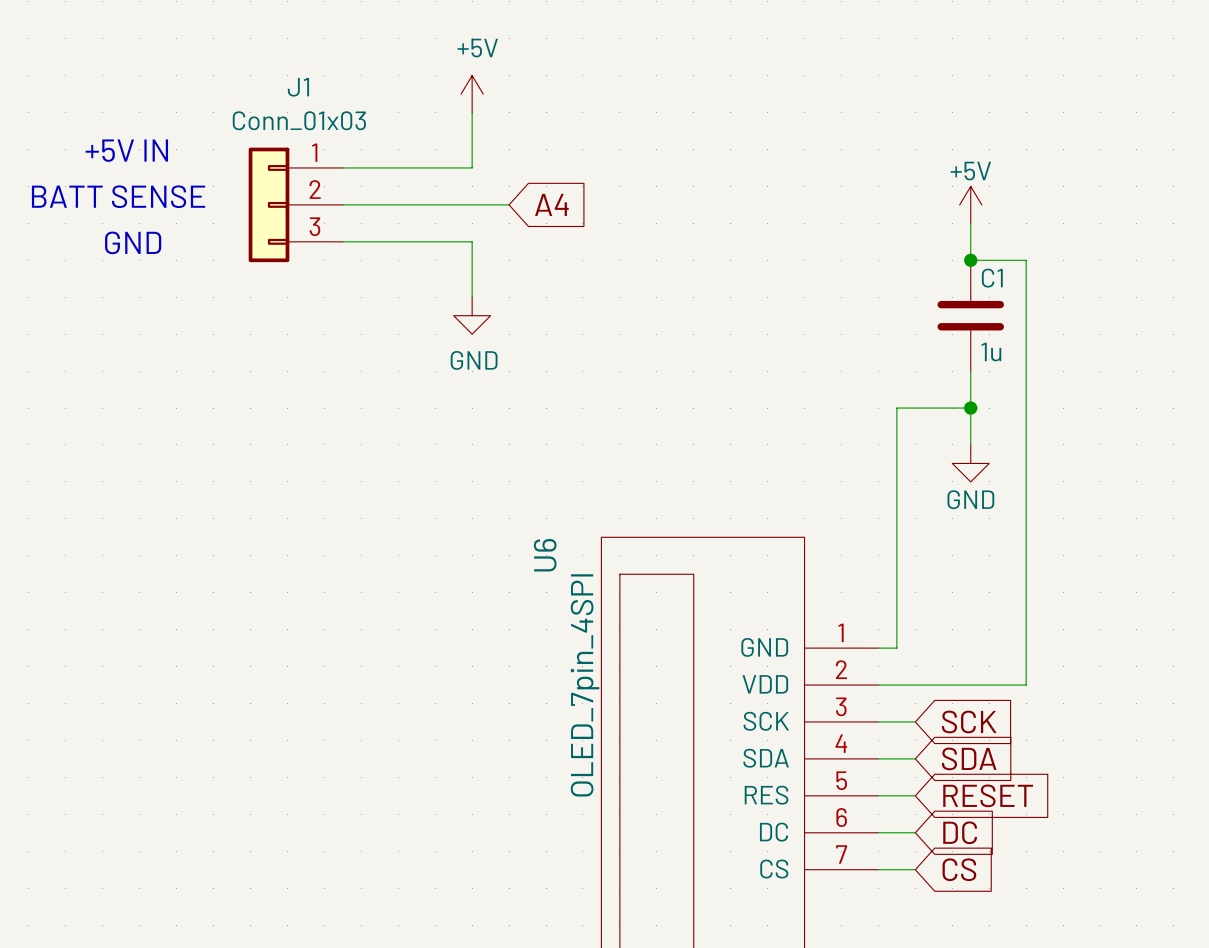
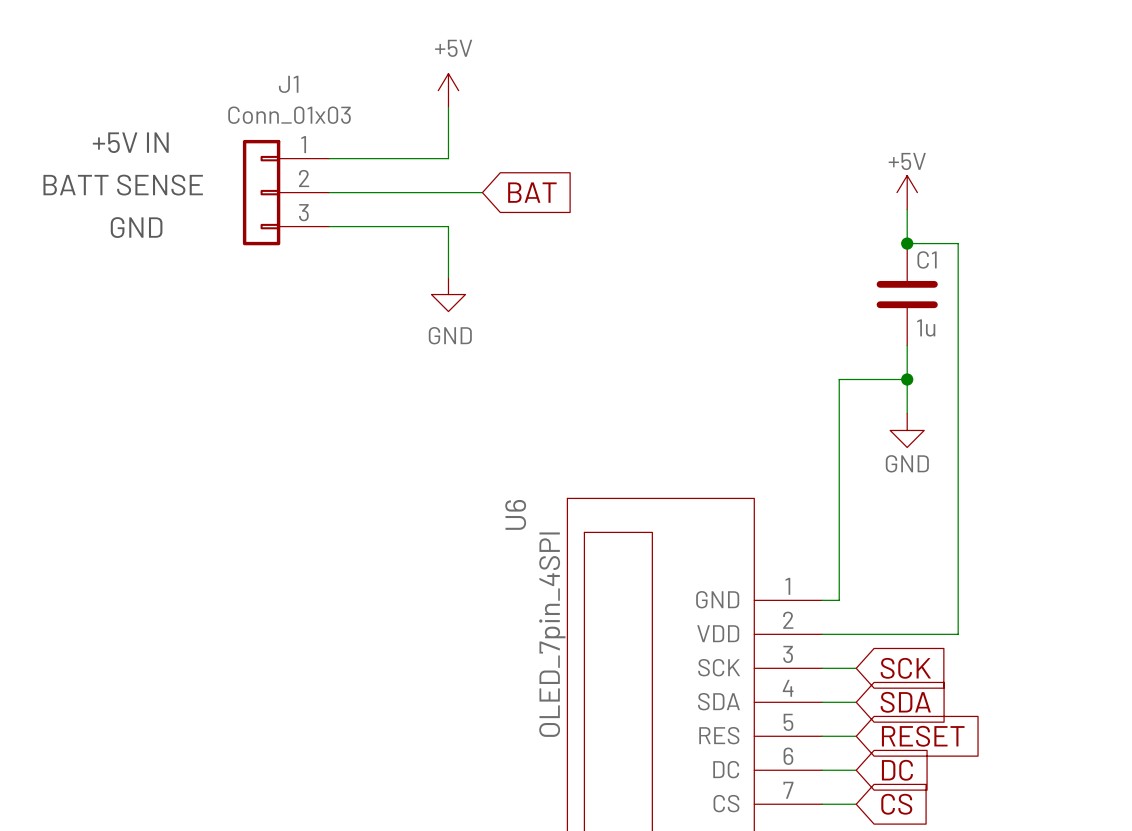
global label: A4 (551, 204) -> BAT (532, 192)

